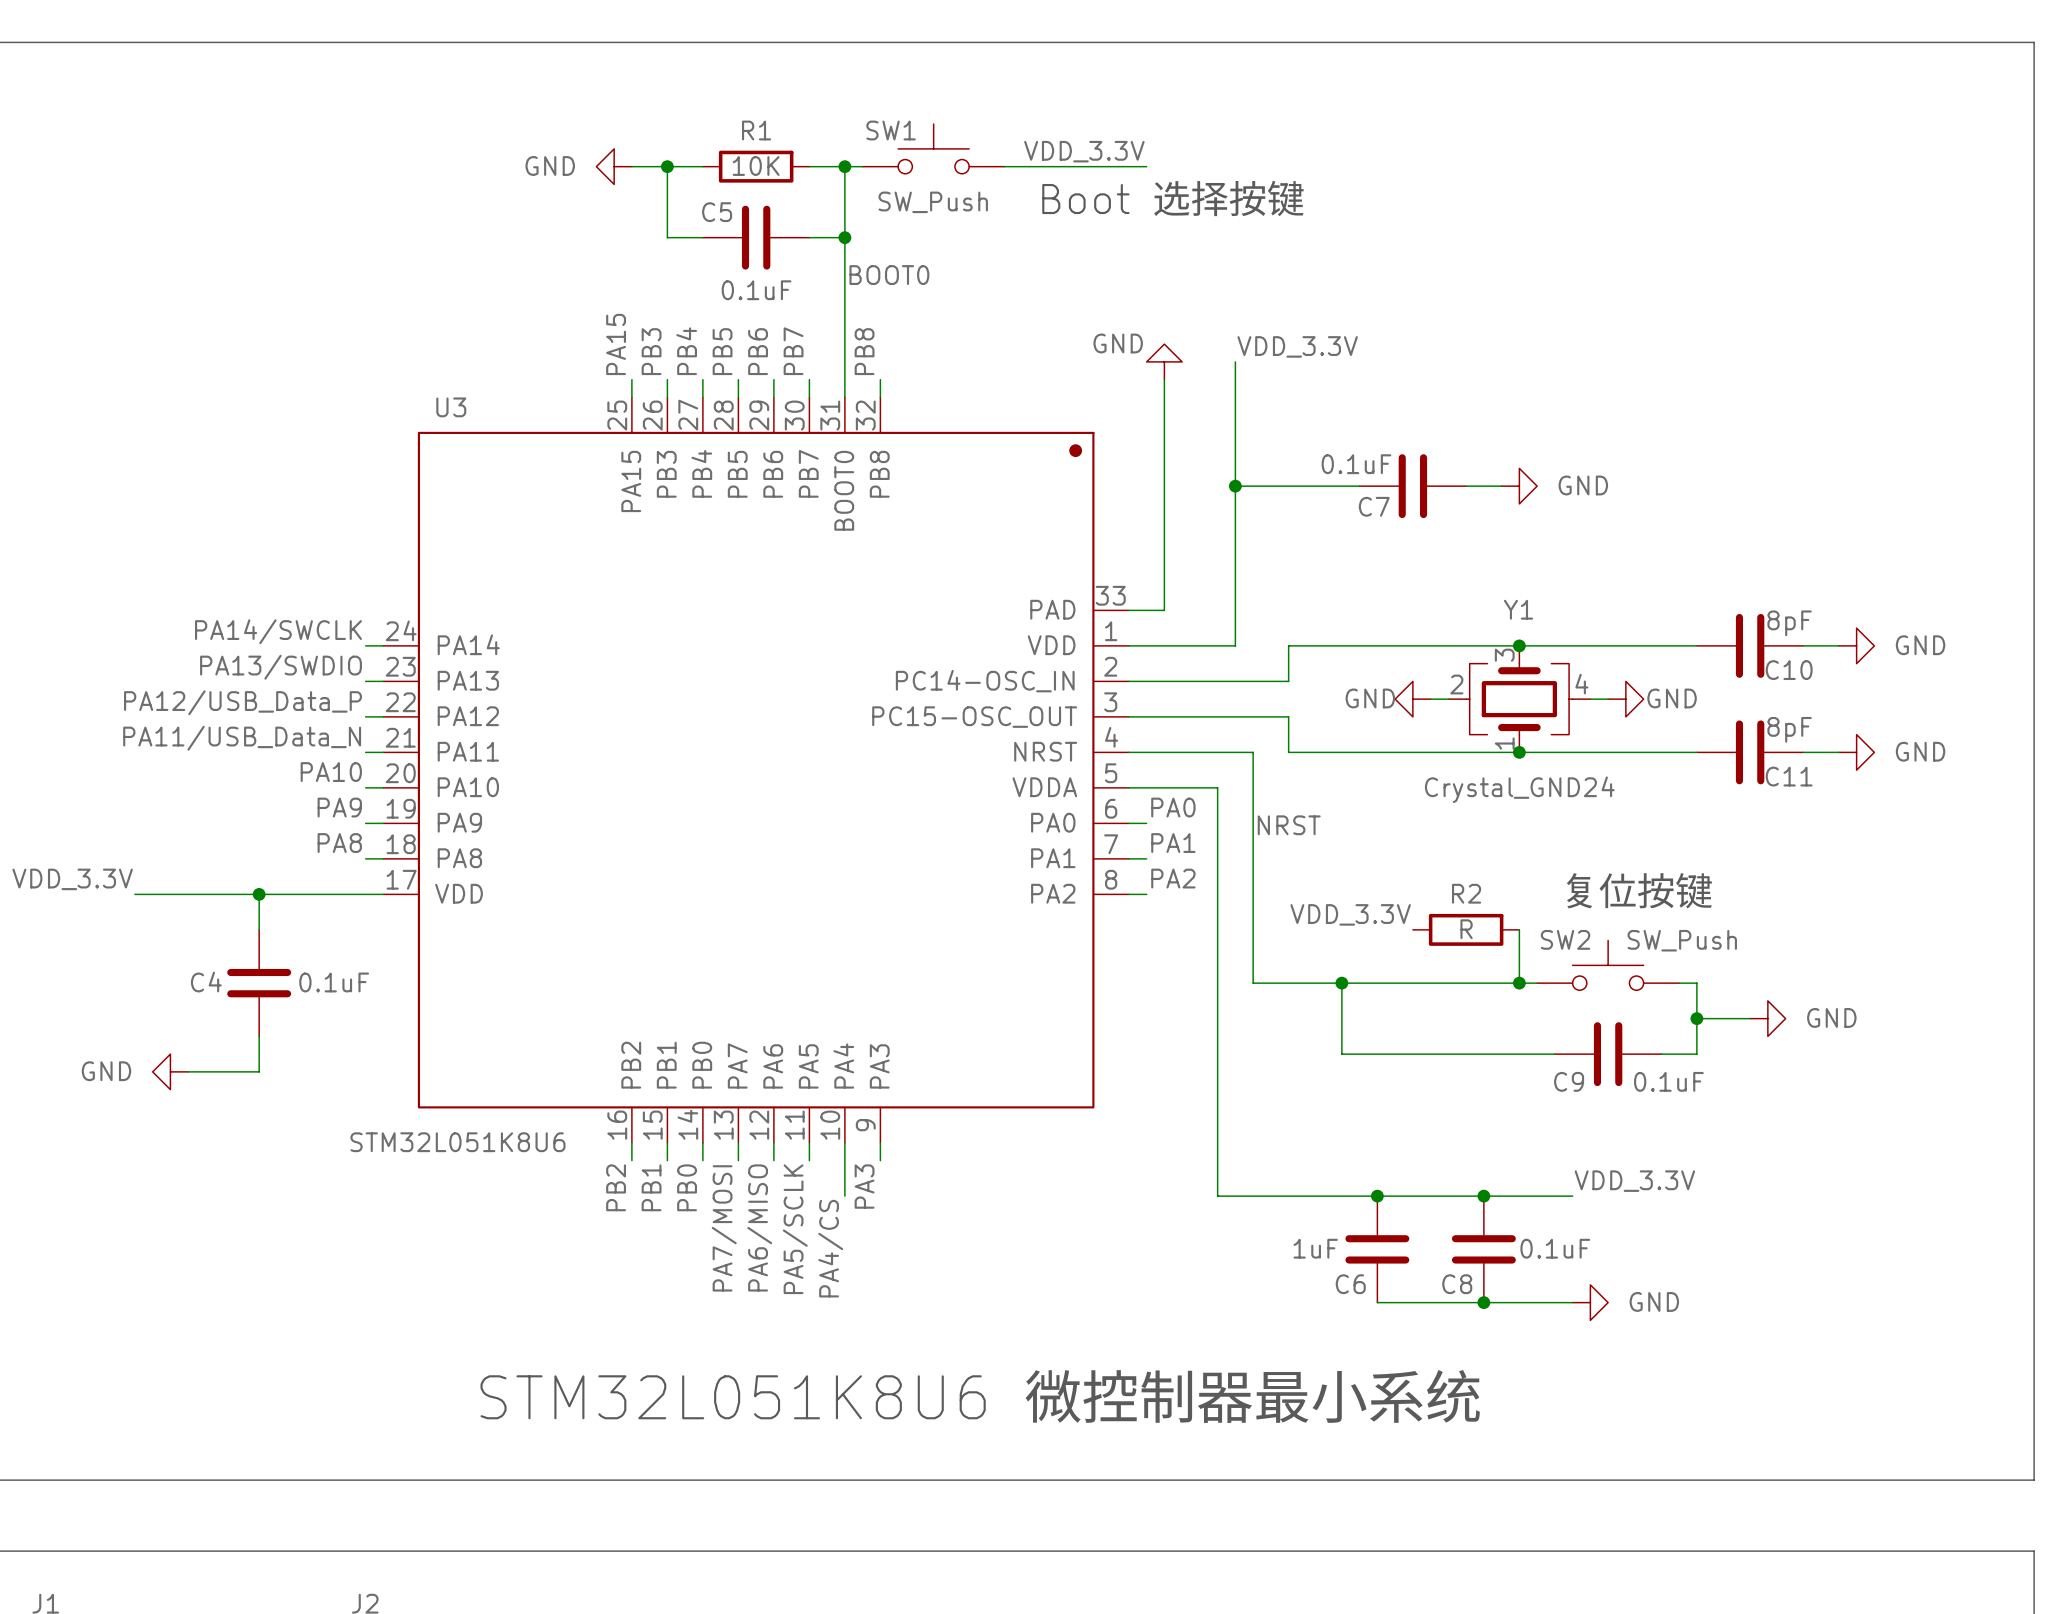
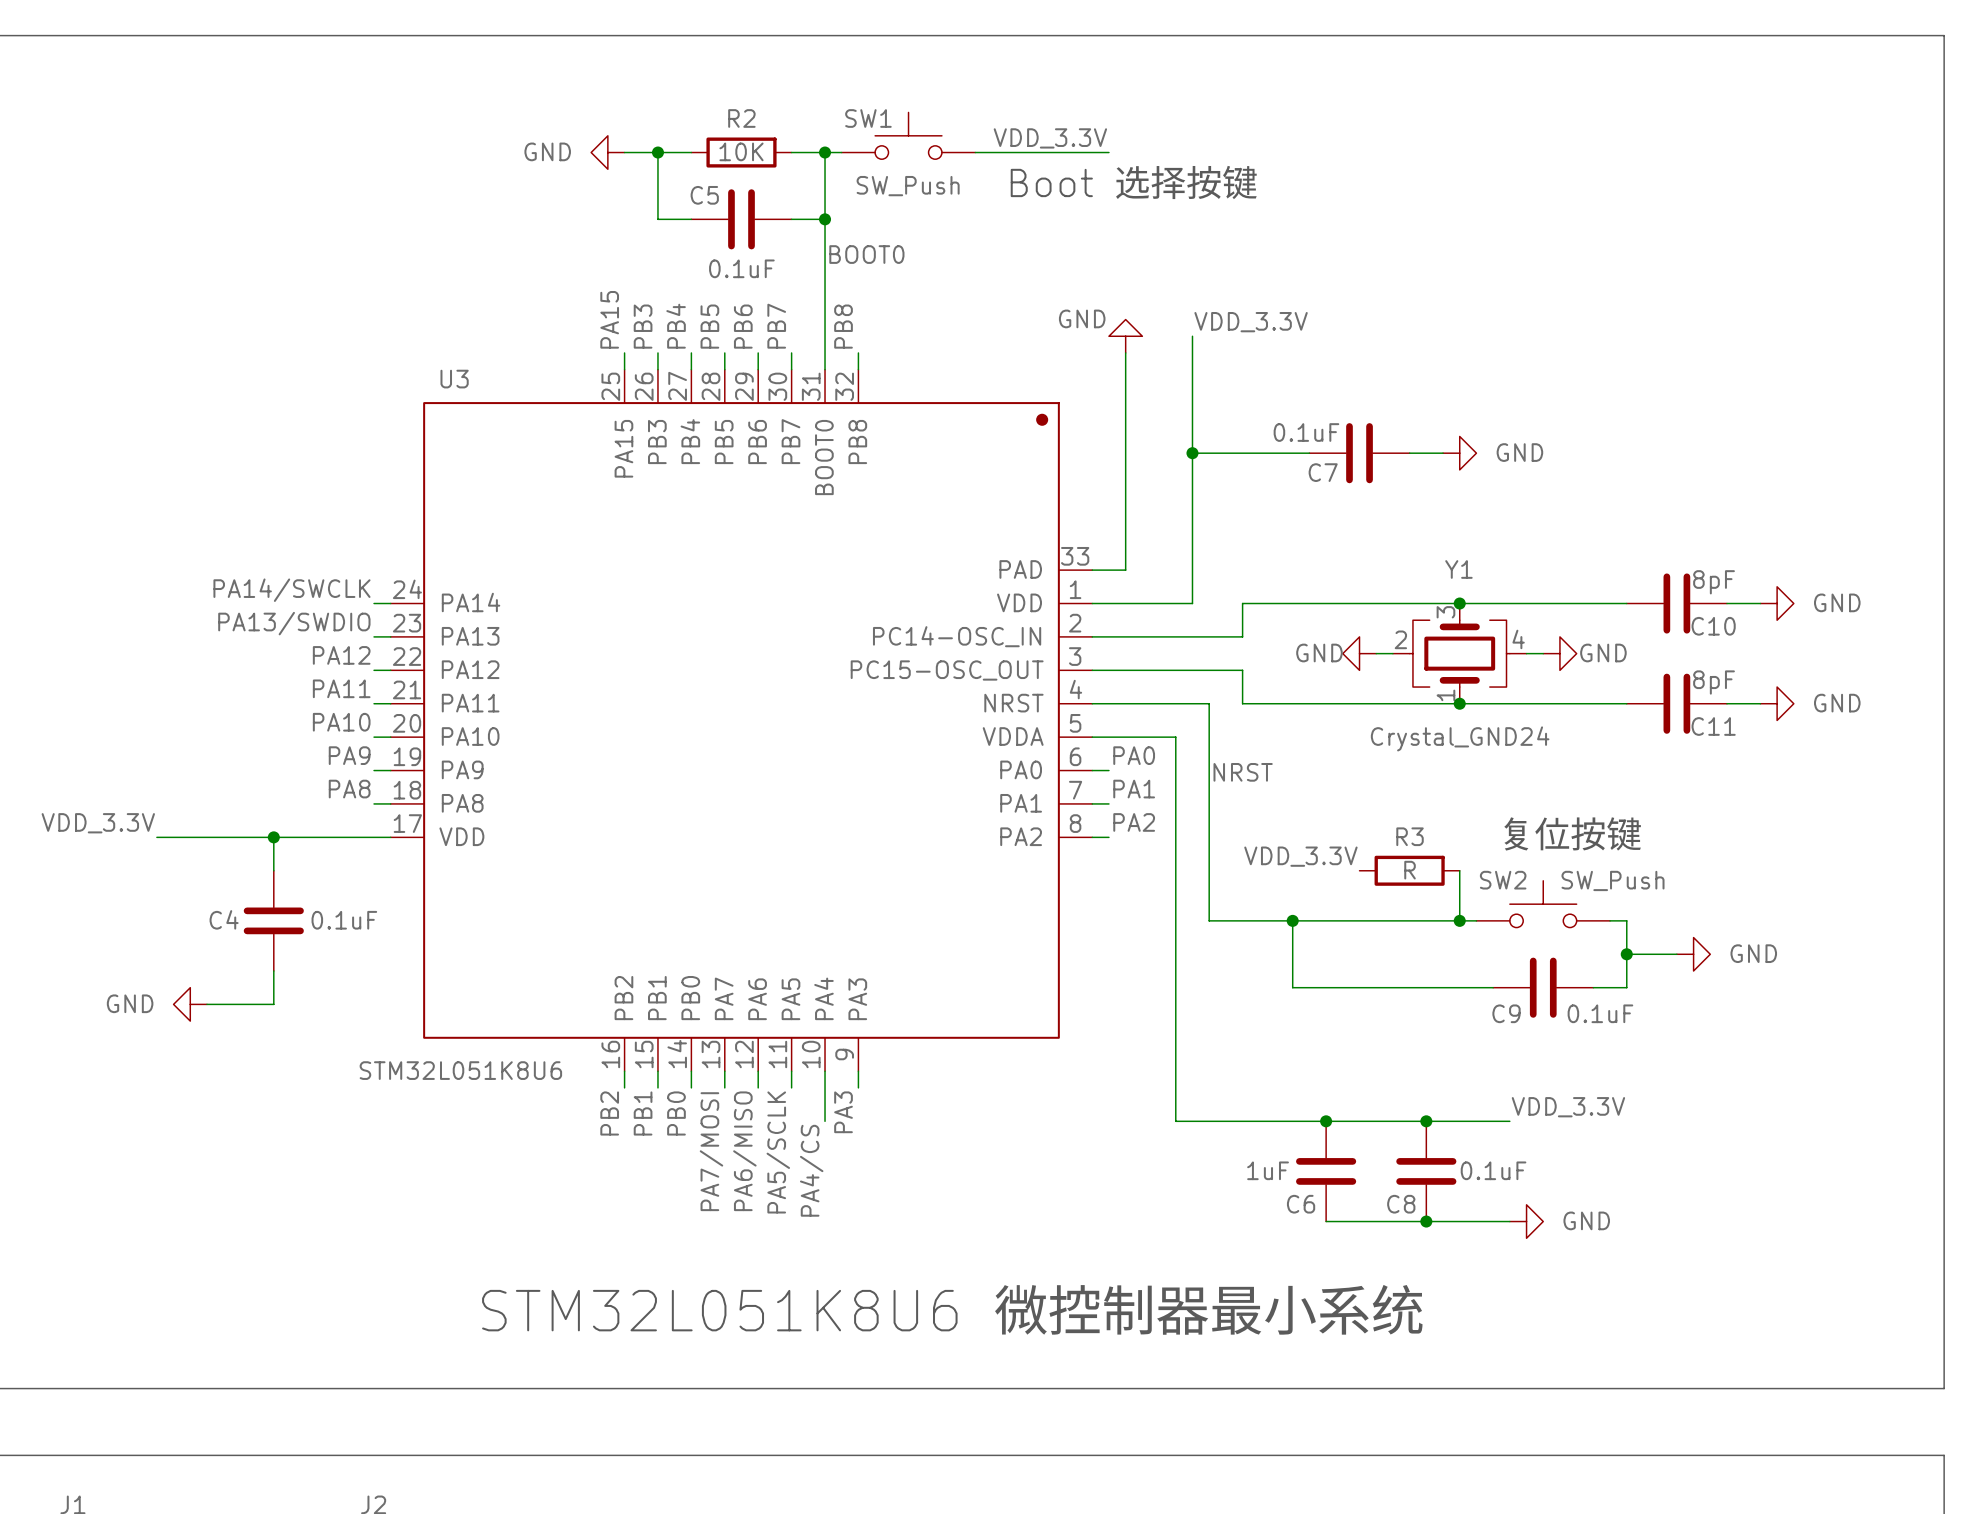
R1 name: R1 (756, 130) -> R2 (741, 118)
label: PA12/USB_Data_P (242, 702) -> PA12 (341, 655)
label: PA11/USB_Data_N (242, 738) -> PA11 (341, 688)
R2 name: R2 (1466, 893) -> R3 (1410, 836)

